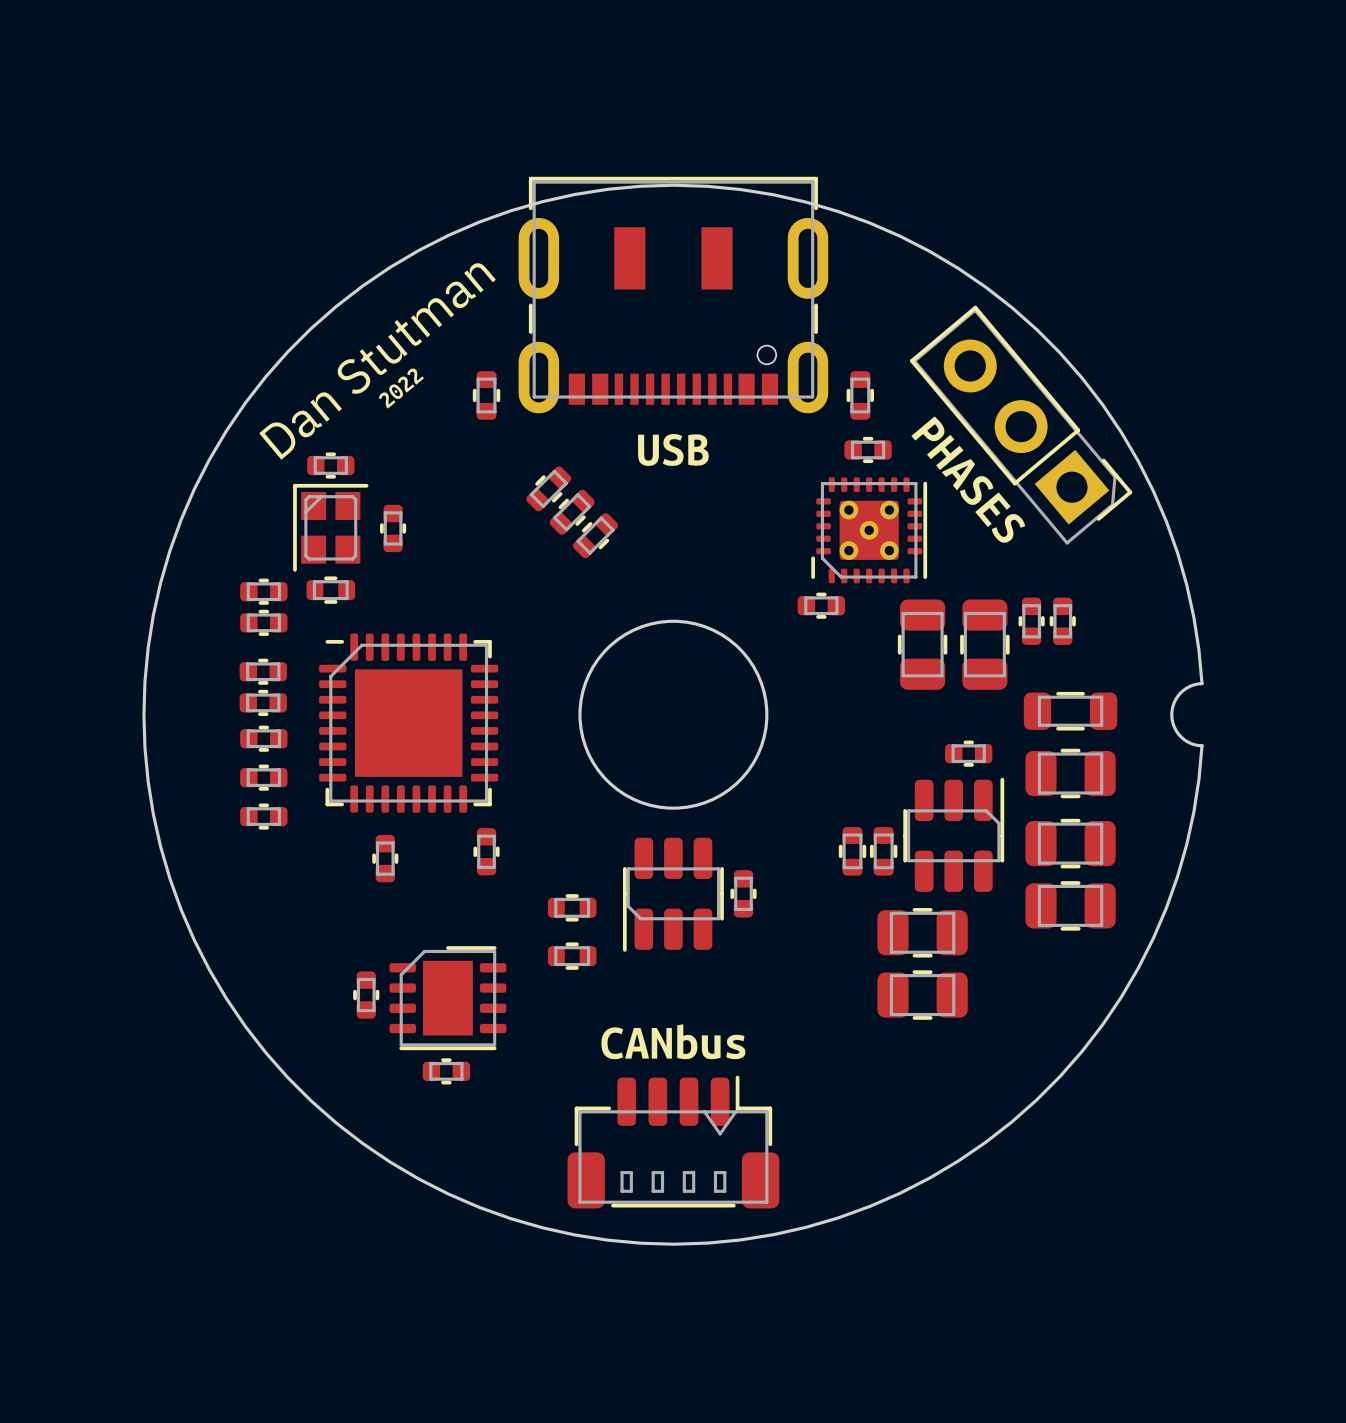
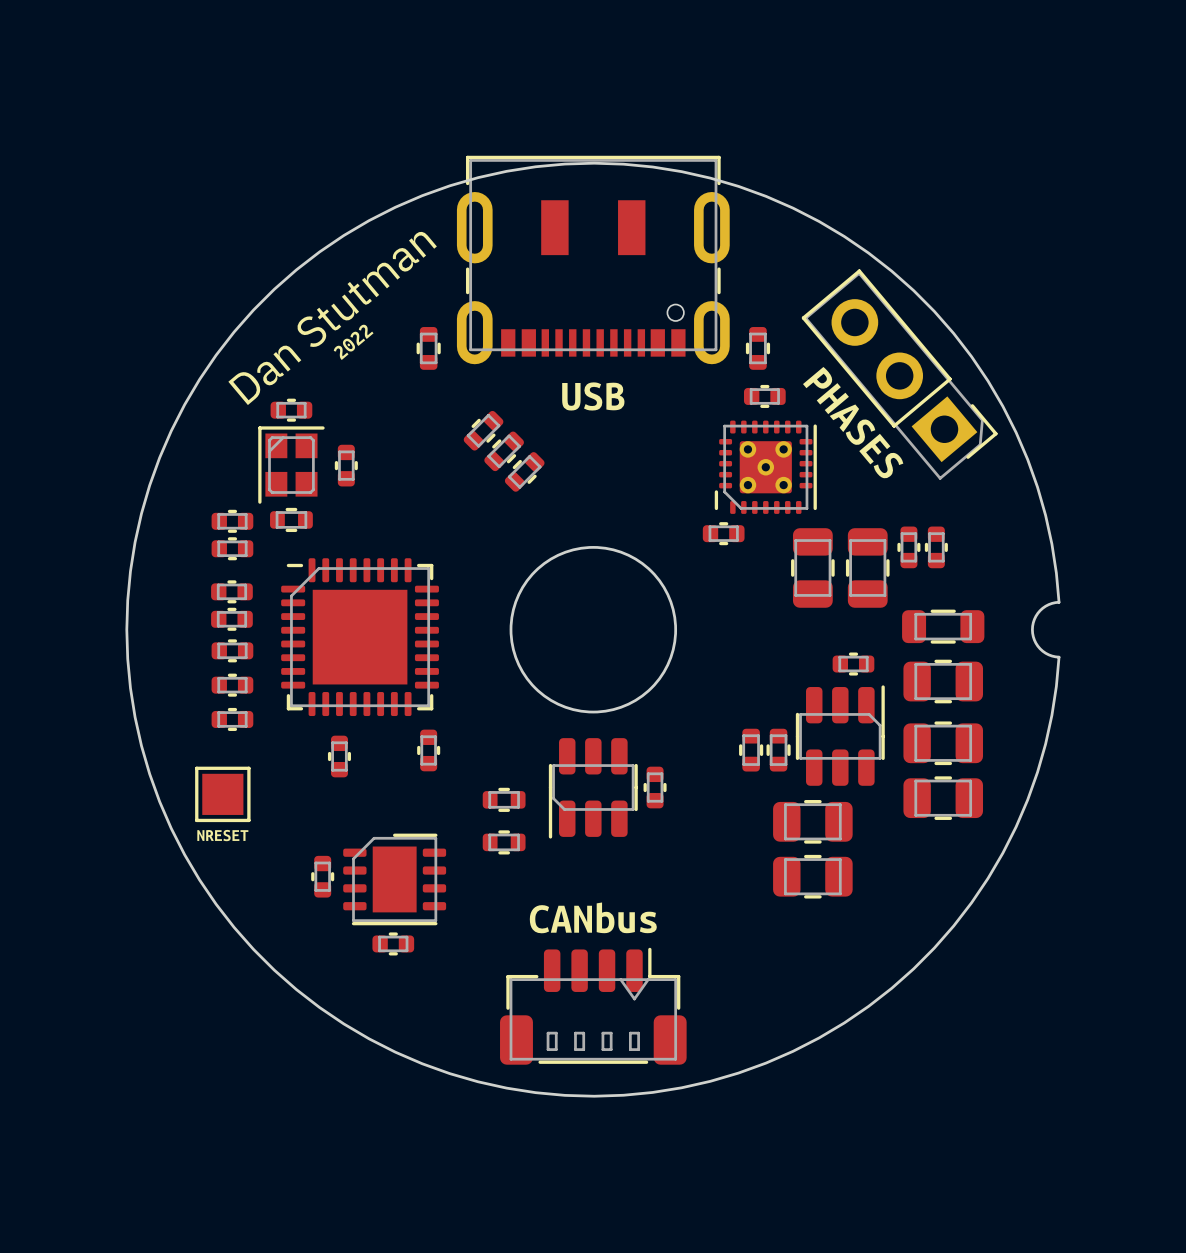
part: none -> (222, 794)
drawing: none -> [197, 829, 249, 842]

